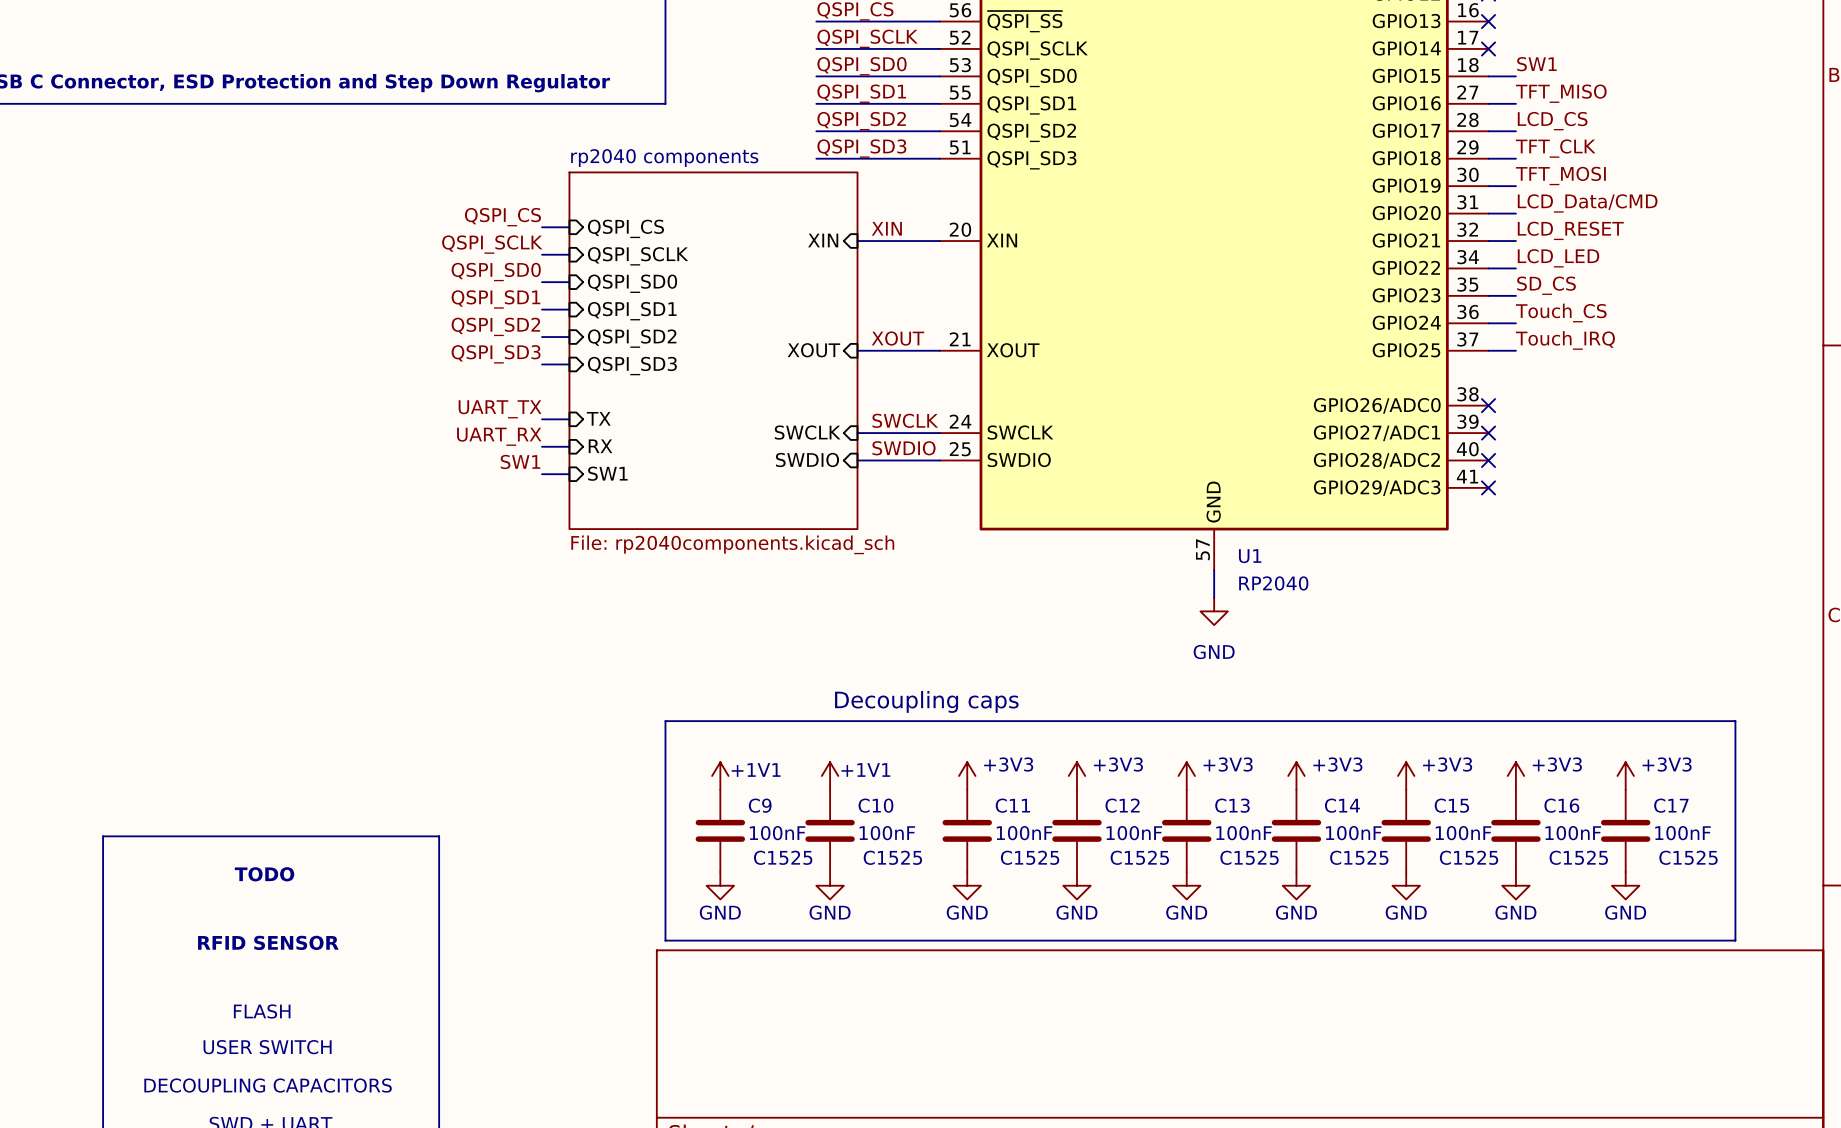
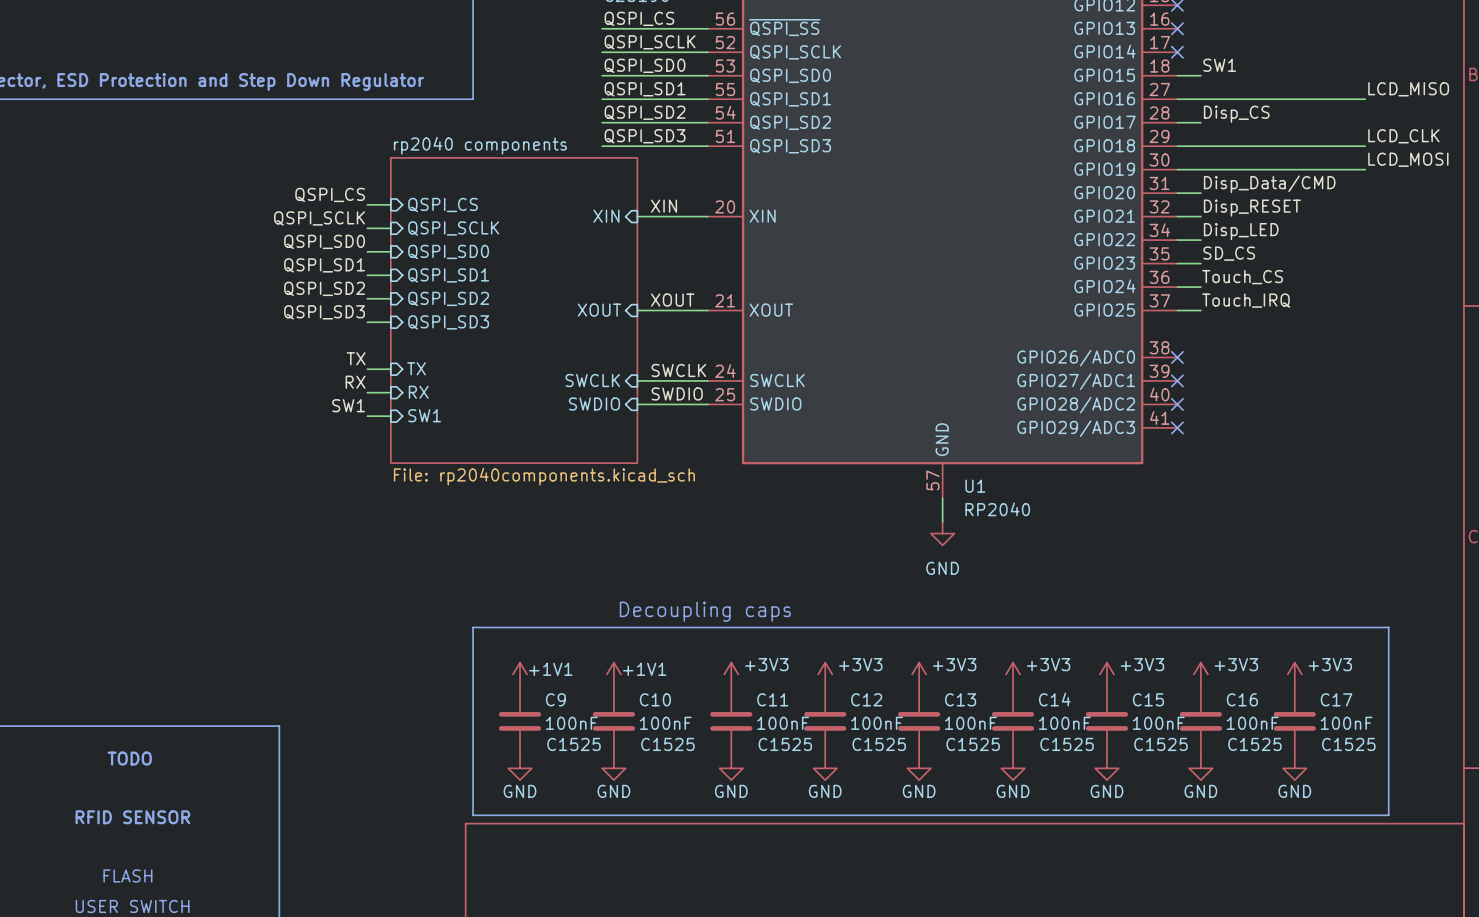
label: TFT_MISO (1561, 93) -> none
label: none -> LCD_MISO (1408, 89)
wire: none -> (1200, 99) (1365, 99)
label: LCD_CS (1552, 121) -> Disp_CS (1236, 114)
label: TFT_CLK (1555, 148) -> none
label: none -> LCD_CLK (1403, 136)
wire: none -> (1200, 146) (1365, 146)
label: TFT_MOSI (1560, 176) -> none
label: none -> LCD_MOSI (1408, 159)
wire: none -> (1200, 169) (1365, 169)
label: LCD_Data/CMD (1587, 203) -> Disp_Data/CMD (1269, 184)
label: LCD_RESET (1570, 230) -> Disp_RESET (1252, 208)
label: LCD_LED (1558, 258) -> Disp_LED (1241, 231)
label: UART_TX (500, 409) -> TX (356, 358)
label: UART_RX (499, 436) -> RX (355, 382)

